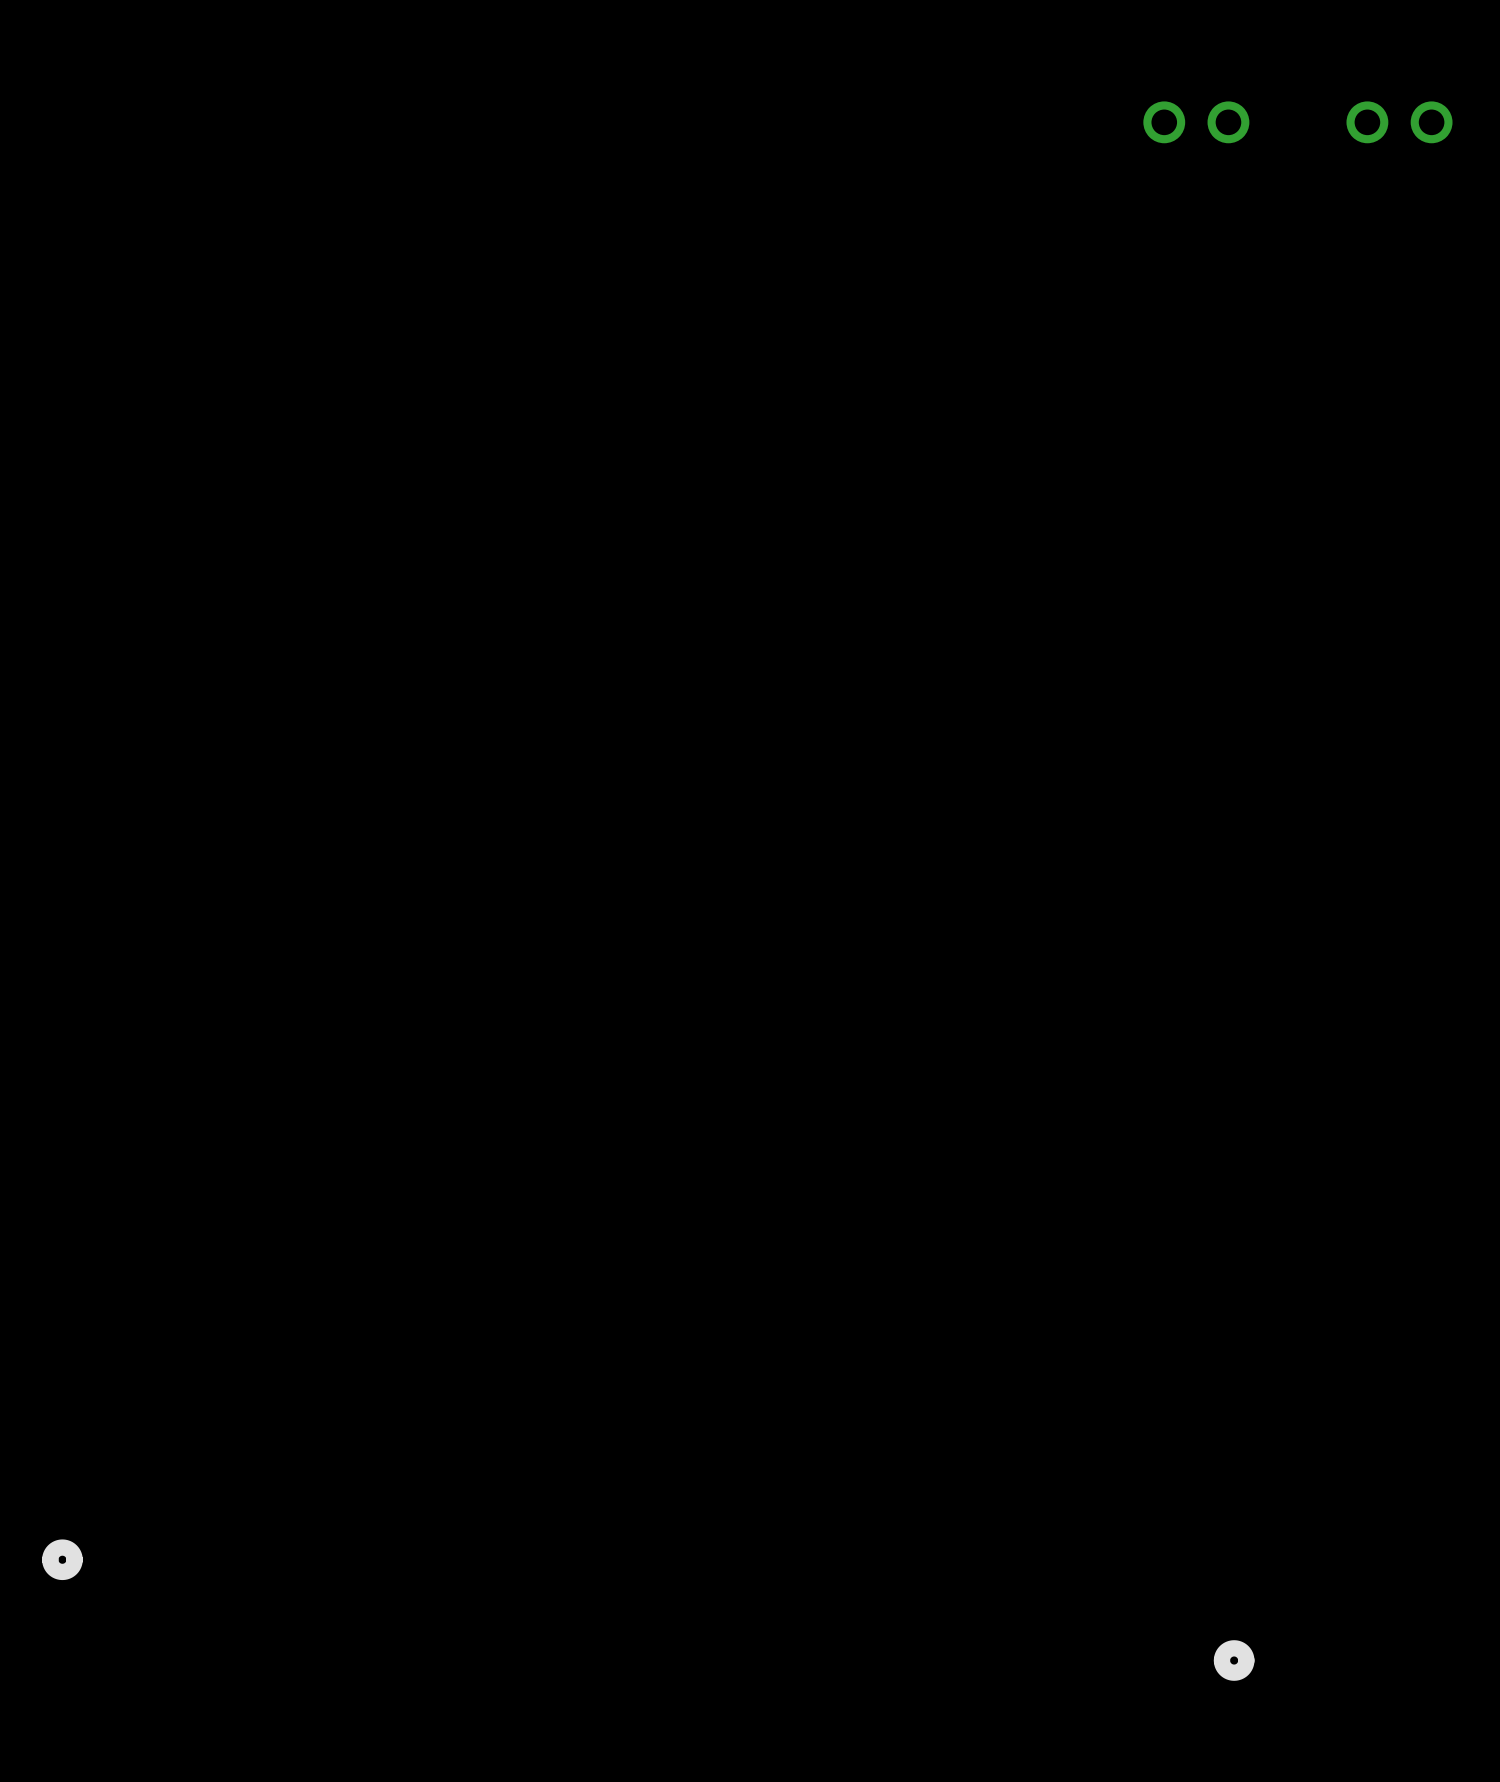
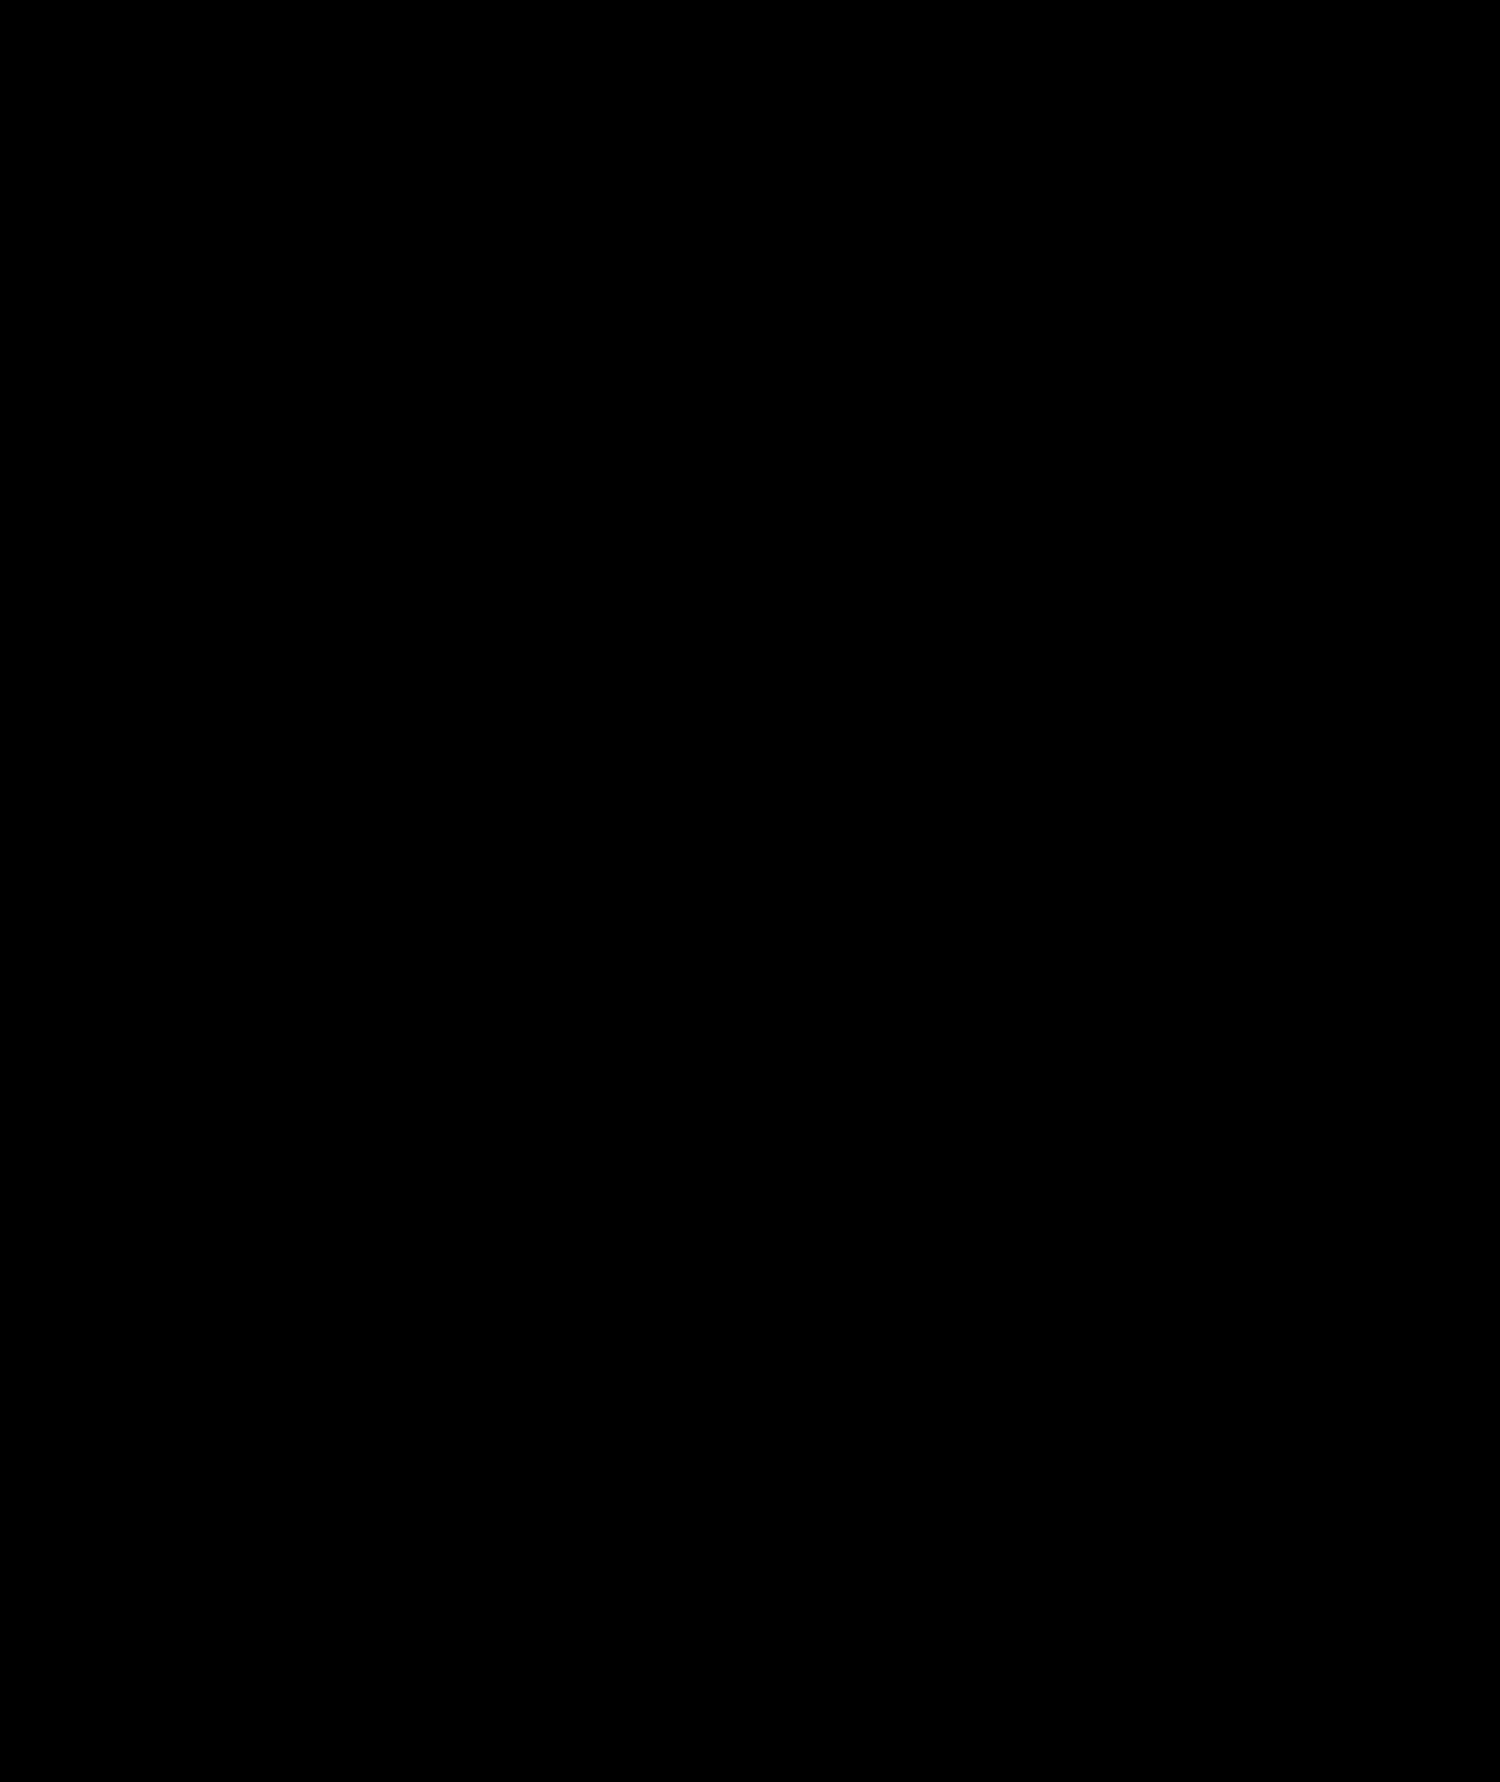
part: (1196, 122) -> none
part: (1399, 122) -> none
part: (62, 1559) -> none
part: (1234, 1660) -> none

